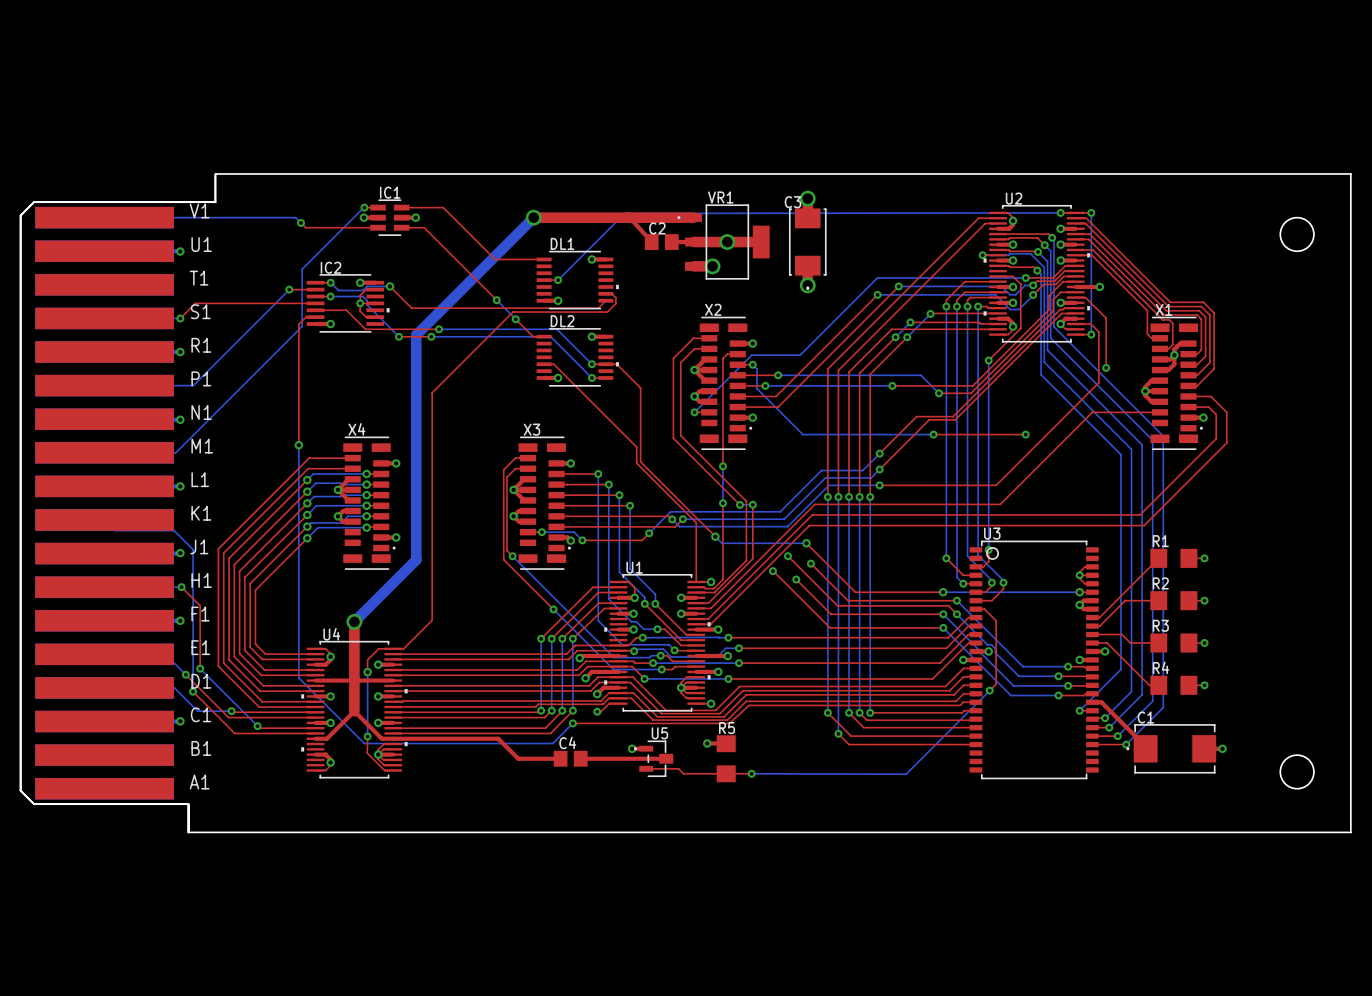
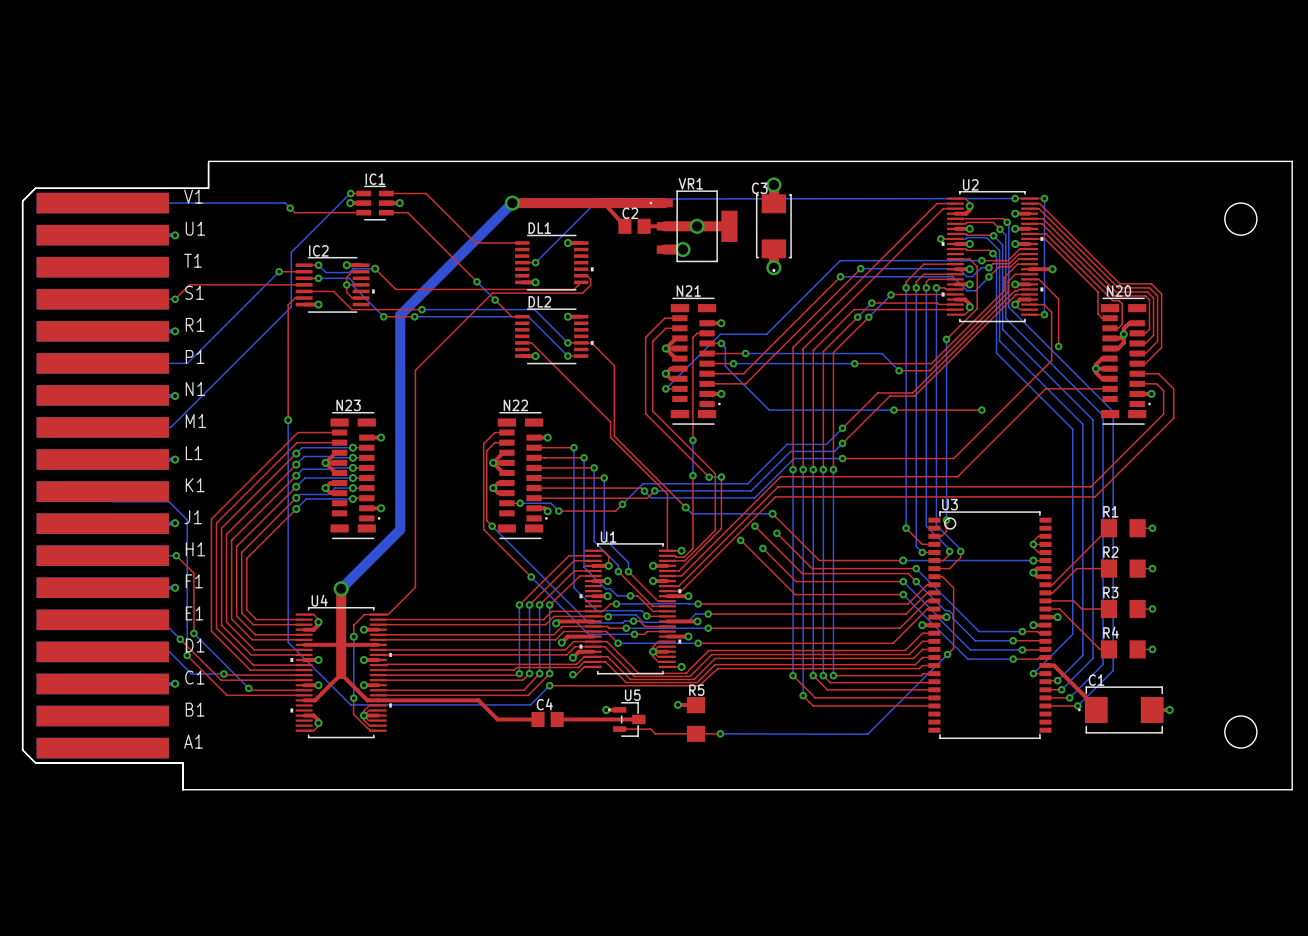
X2 name: X2 (713, 309) -> N21 (688, 291)
X1 name: X1 (1163, 309) -> N20 (1119, 291)
X4 name: X4 (356, 429) -> N23 (348, 405)
X3 name: X3 (531, 429) -> N22 (515, 405)

